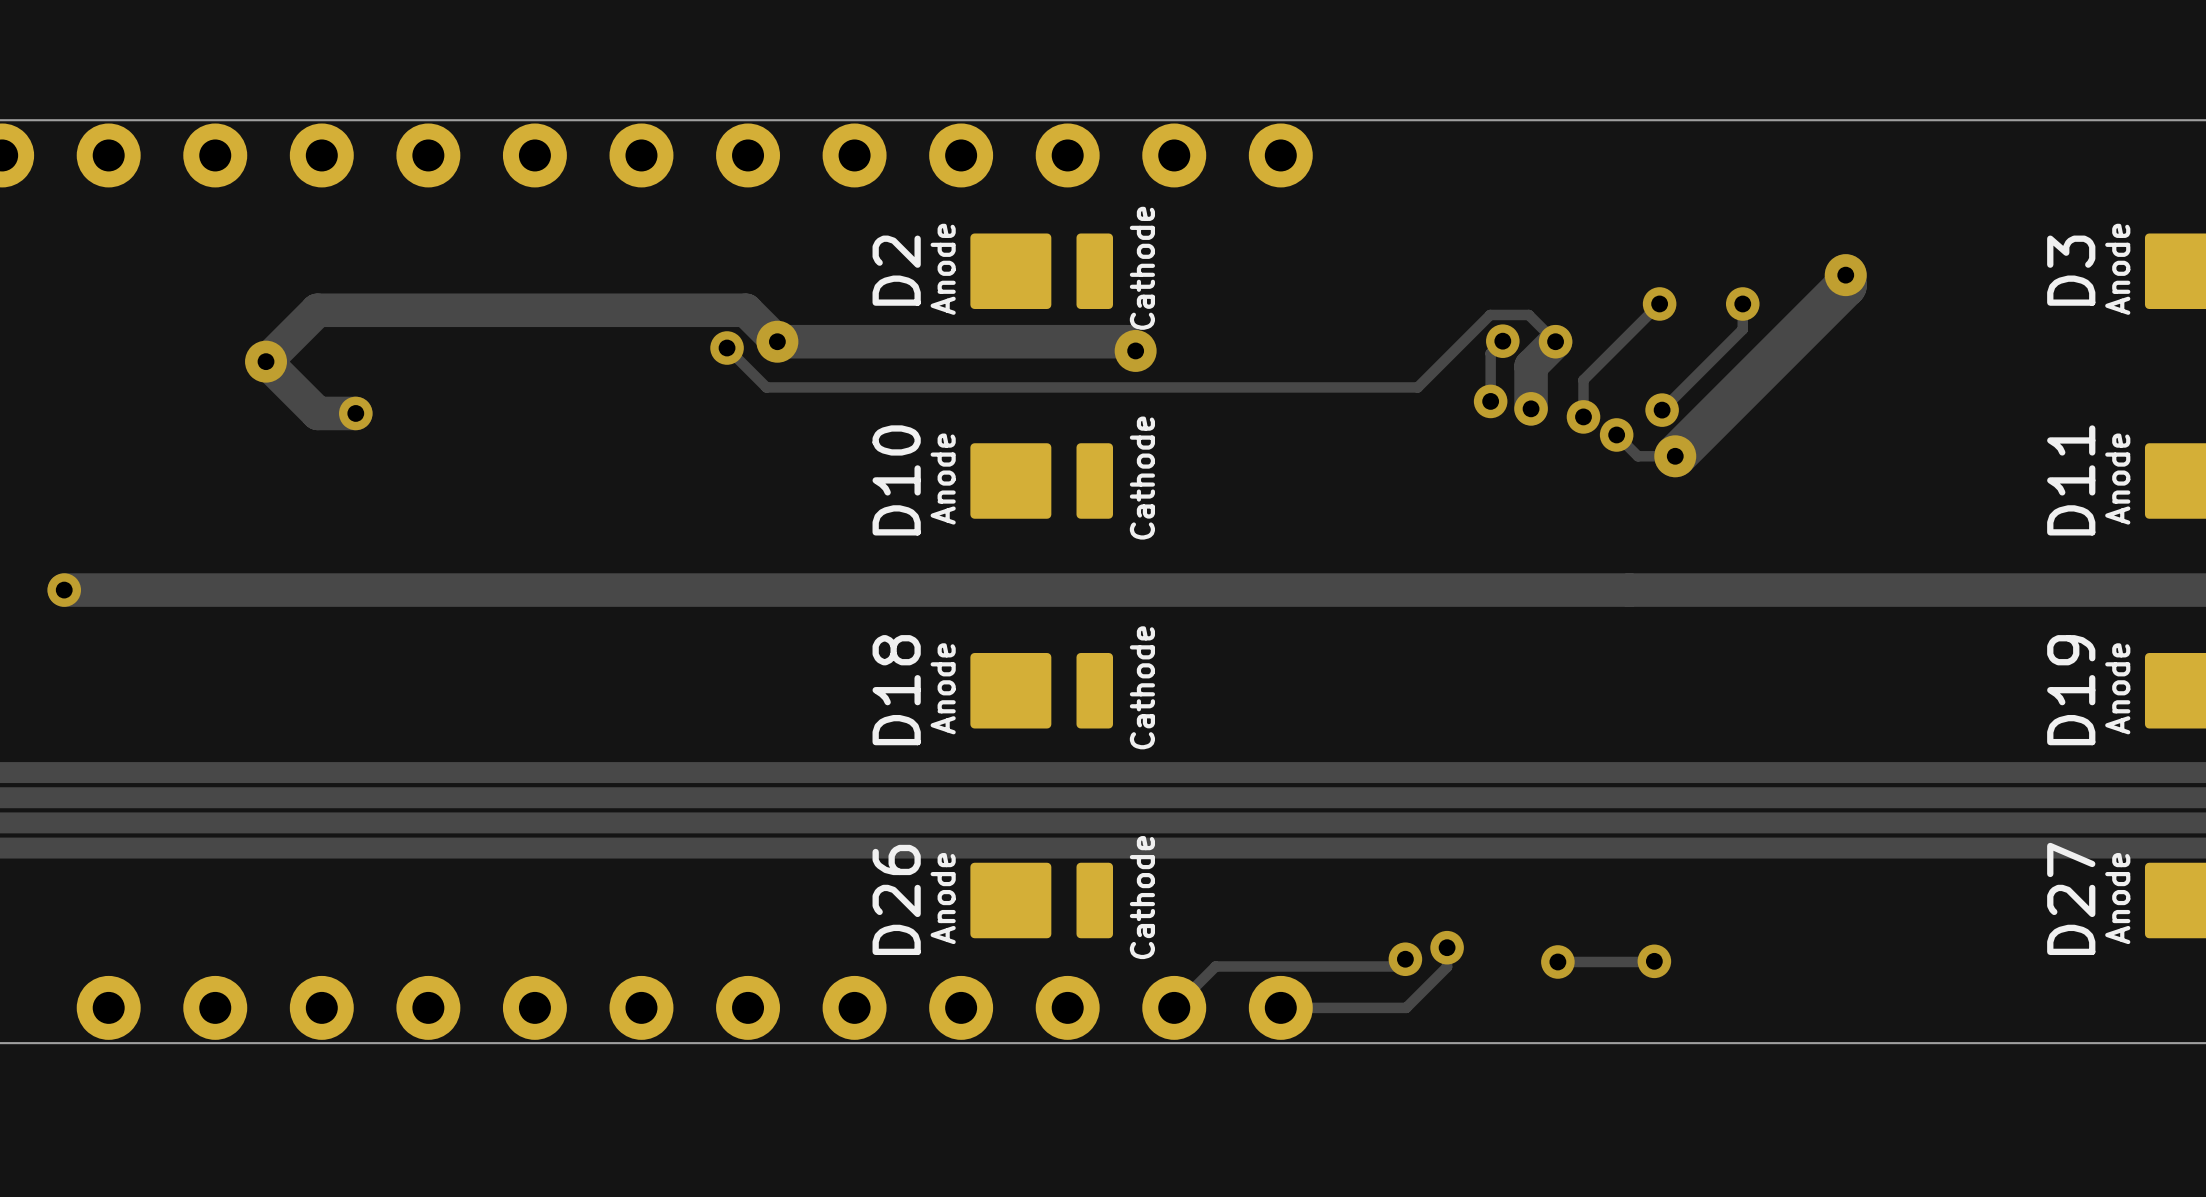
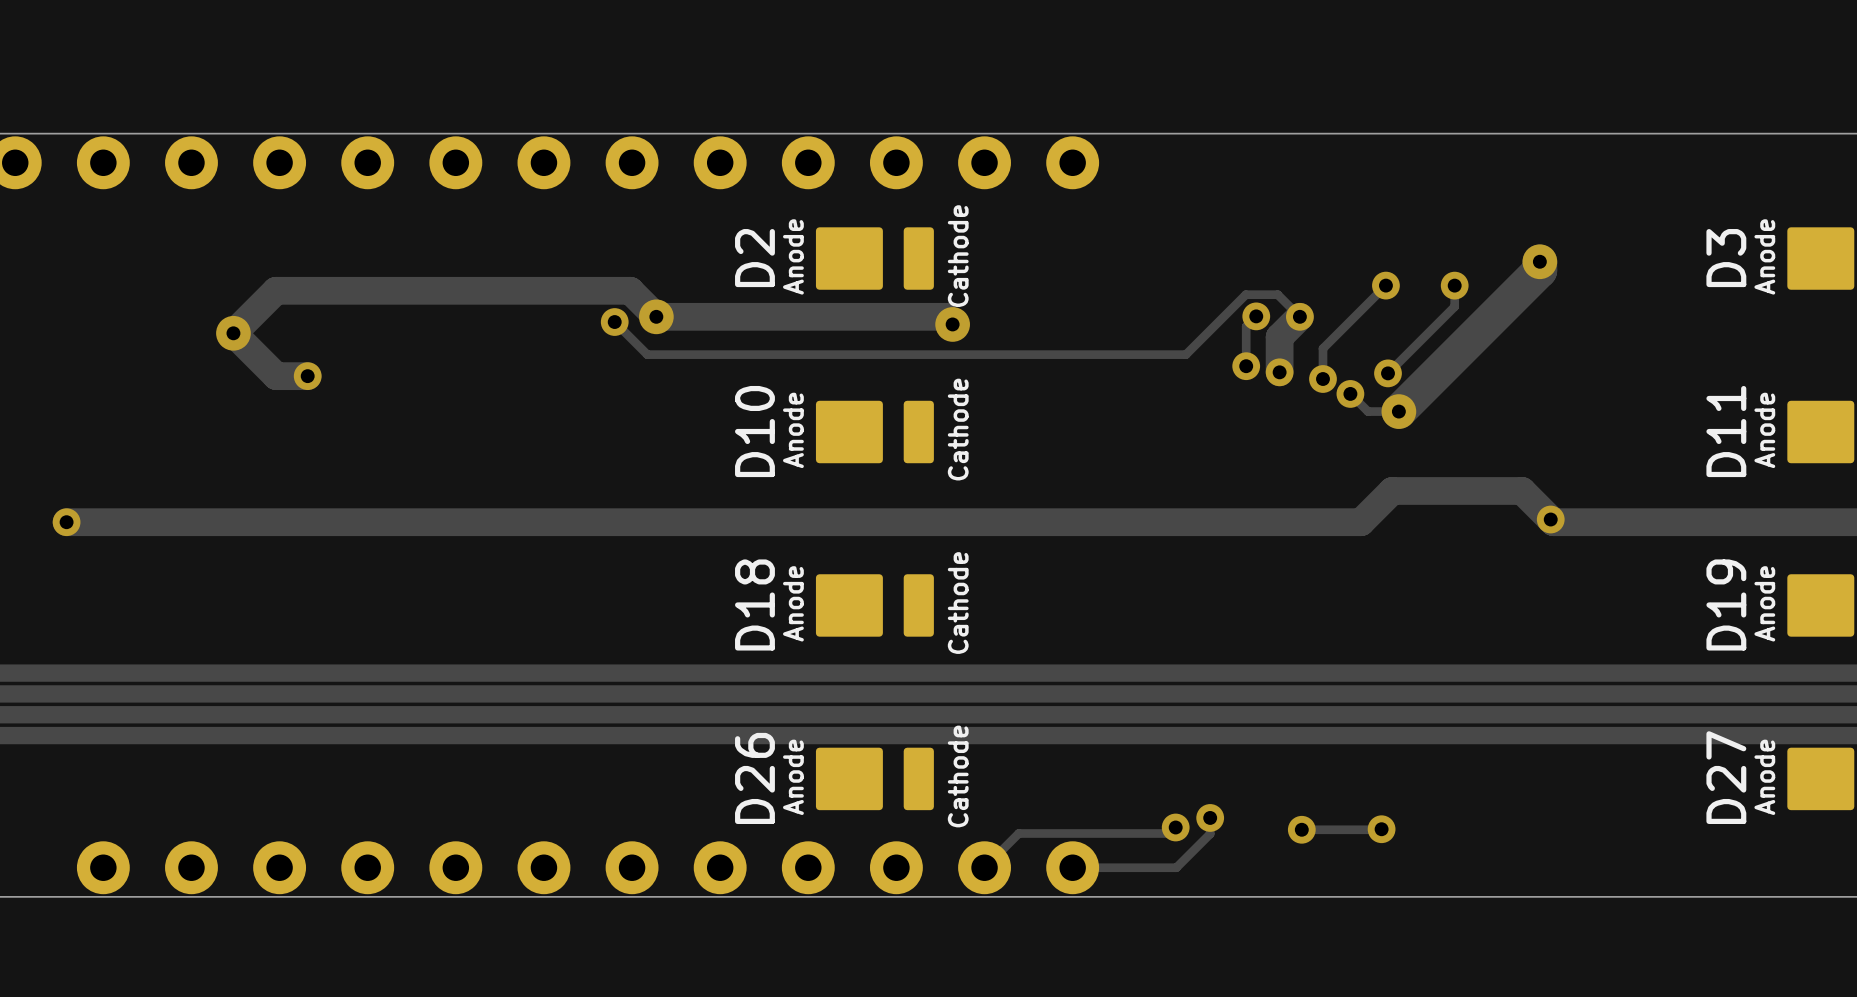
via: none -> (1550, 519)
track: (1629, 590) (1862, 590) -> (1360, 522) (1392, 490) (1522, 490) (1553, 522)

